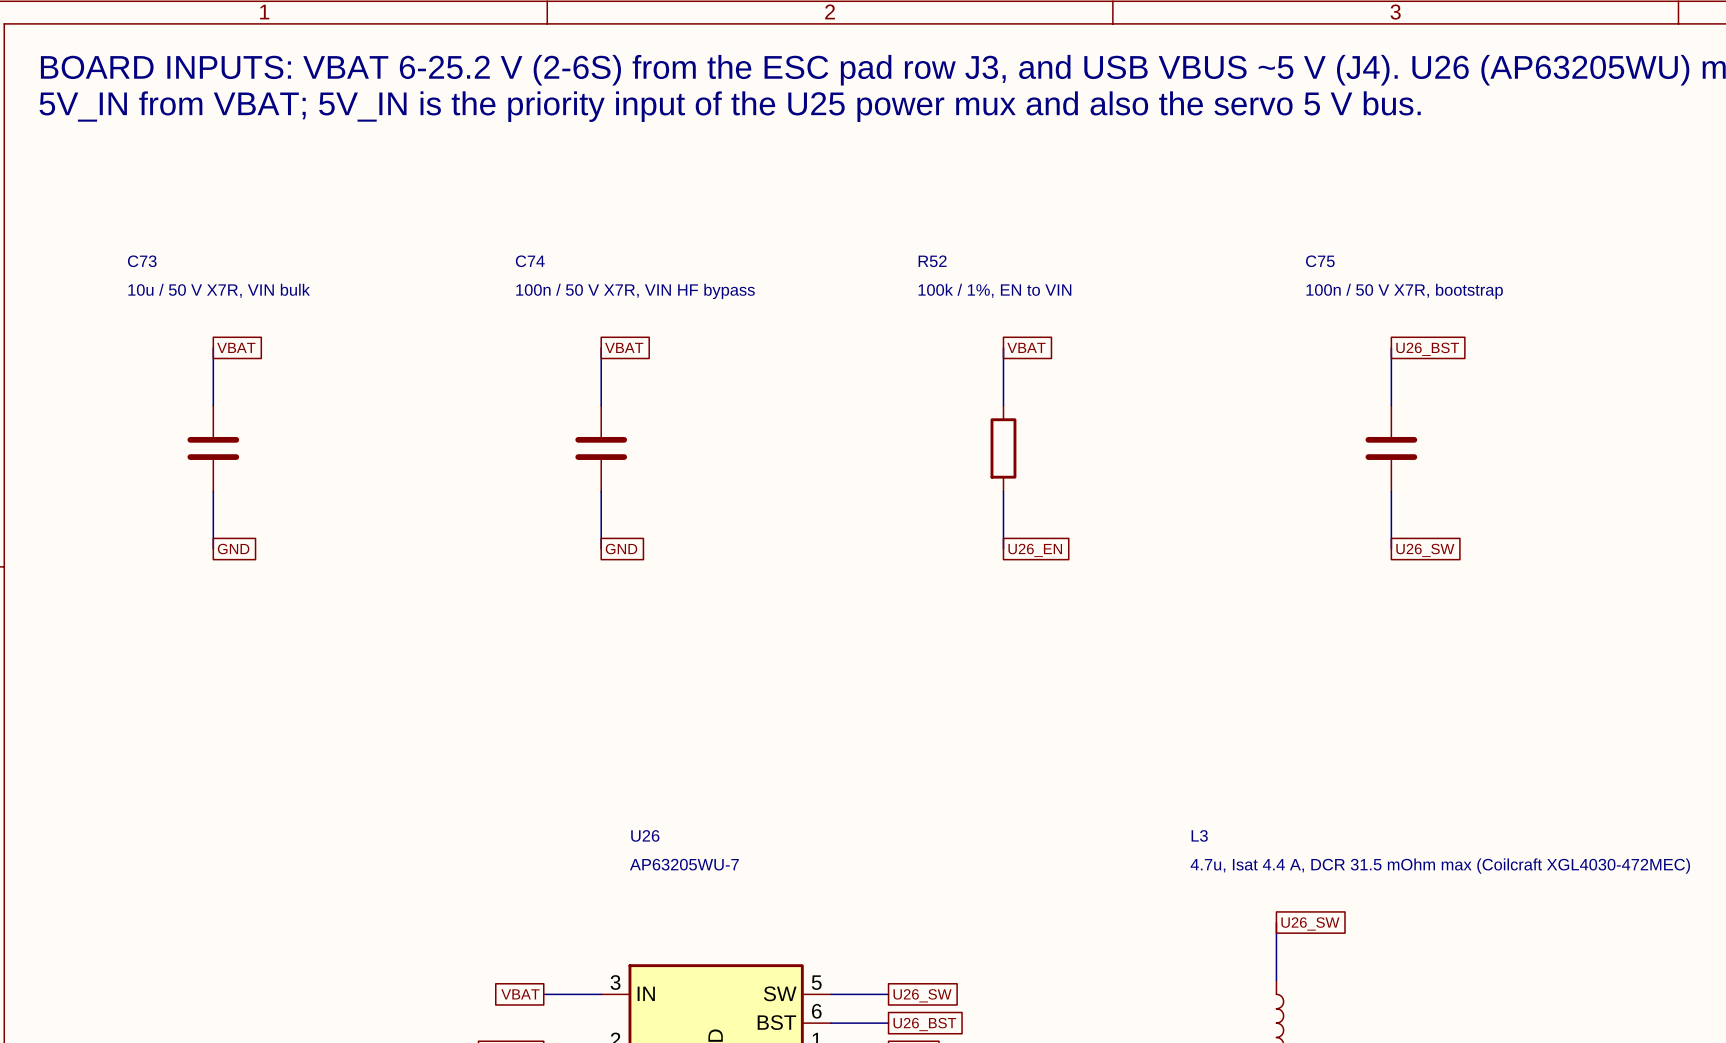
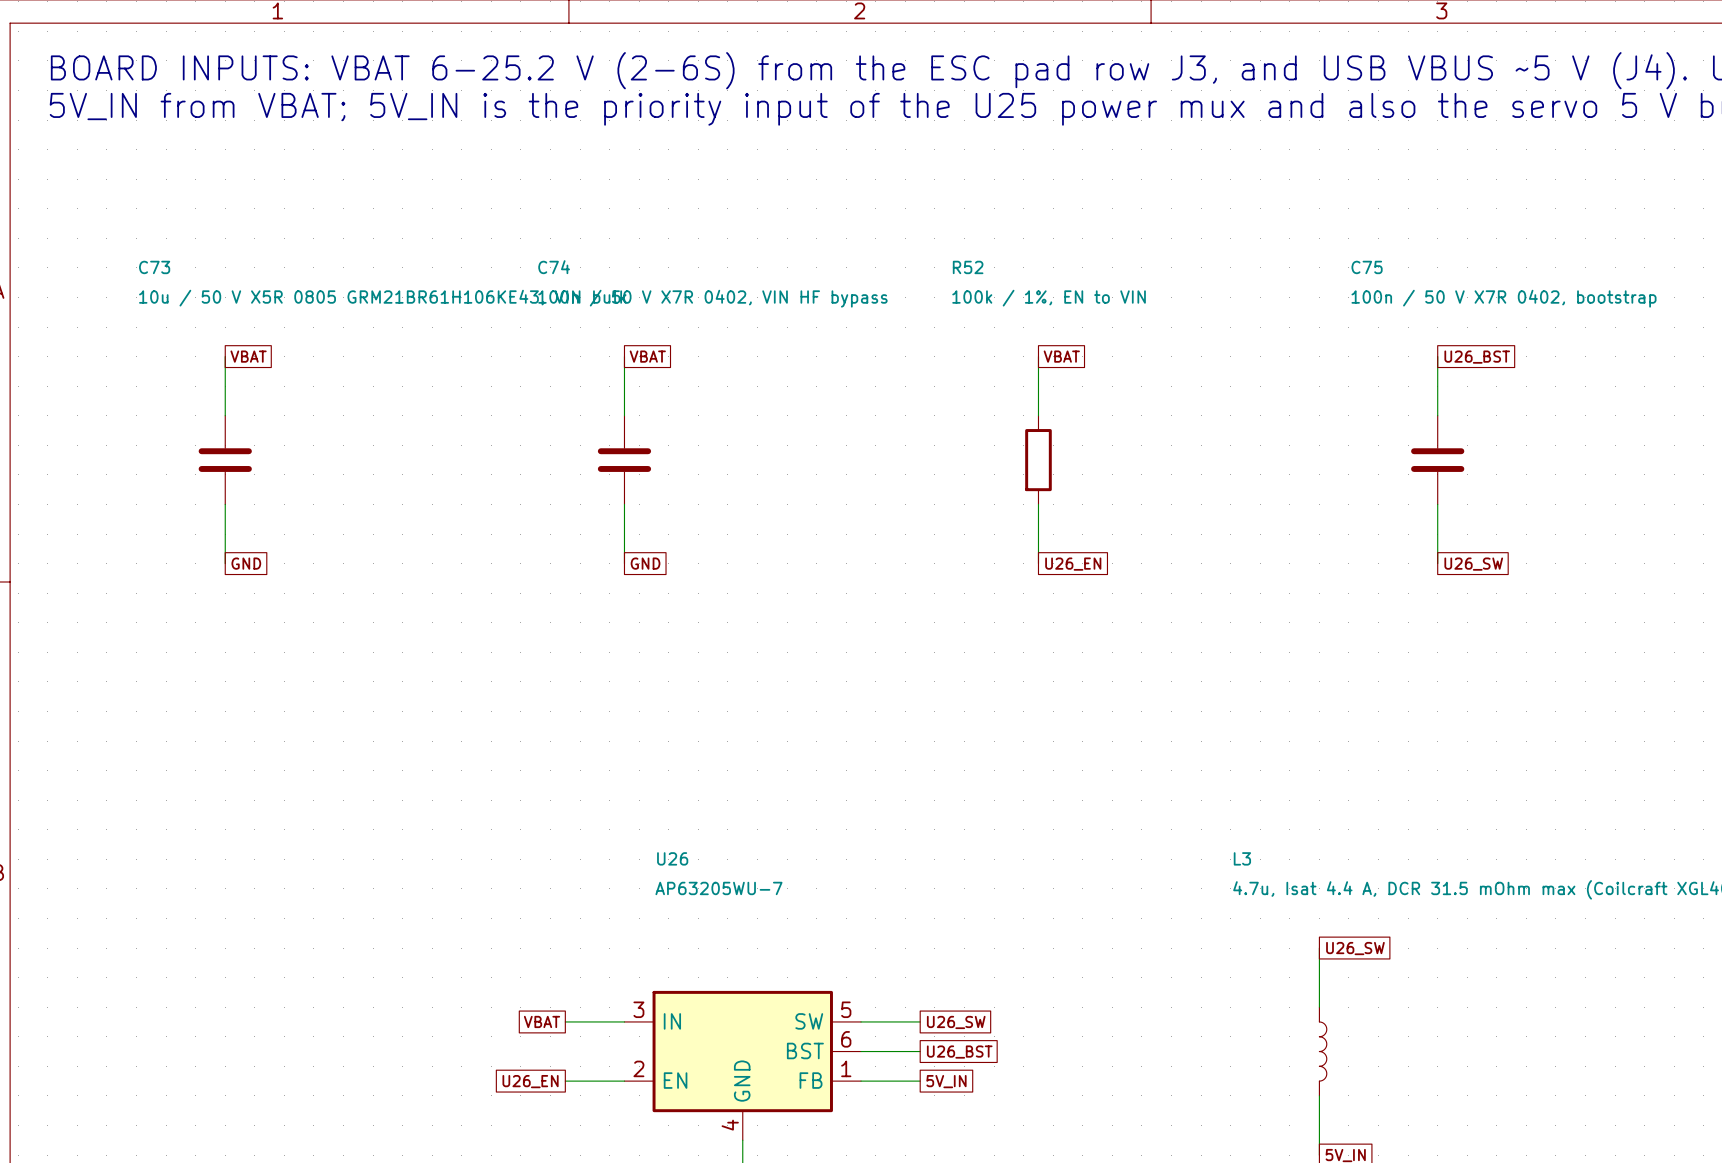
C73 value: 10u / 50 V X7R, VIN bulk (219, 290) -> 10u / 50 V X5R 0805 GRM21BR61H106KE43, VIN bulk (382, 298)
C74 value: 100n / 50 V X7R, VIN HF bypass (635, 291) -> 100n / 50 V X7R 0402, VIN HF bypass (712, 298)
C75 value: 100n / 50 V X7R, bootstrap (1404, 291) -> 100n / 50 V X7R 0402, bootstrap (1504, 298)

